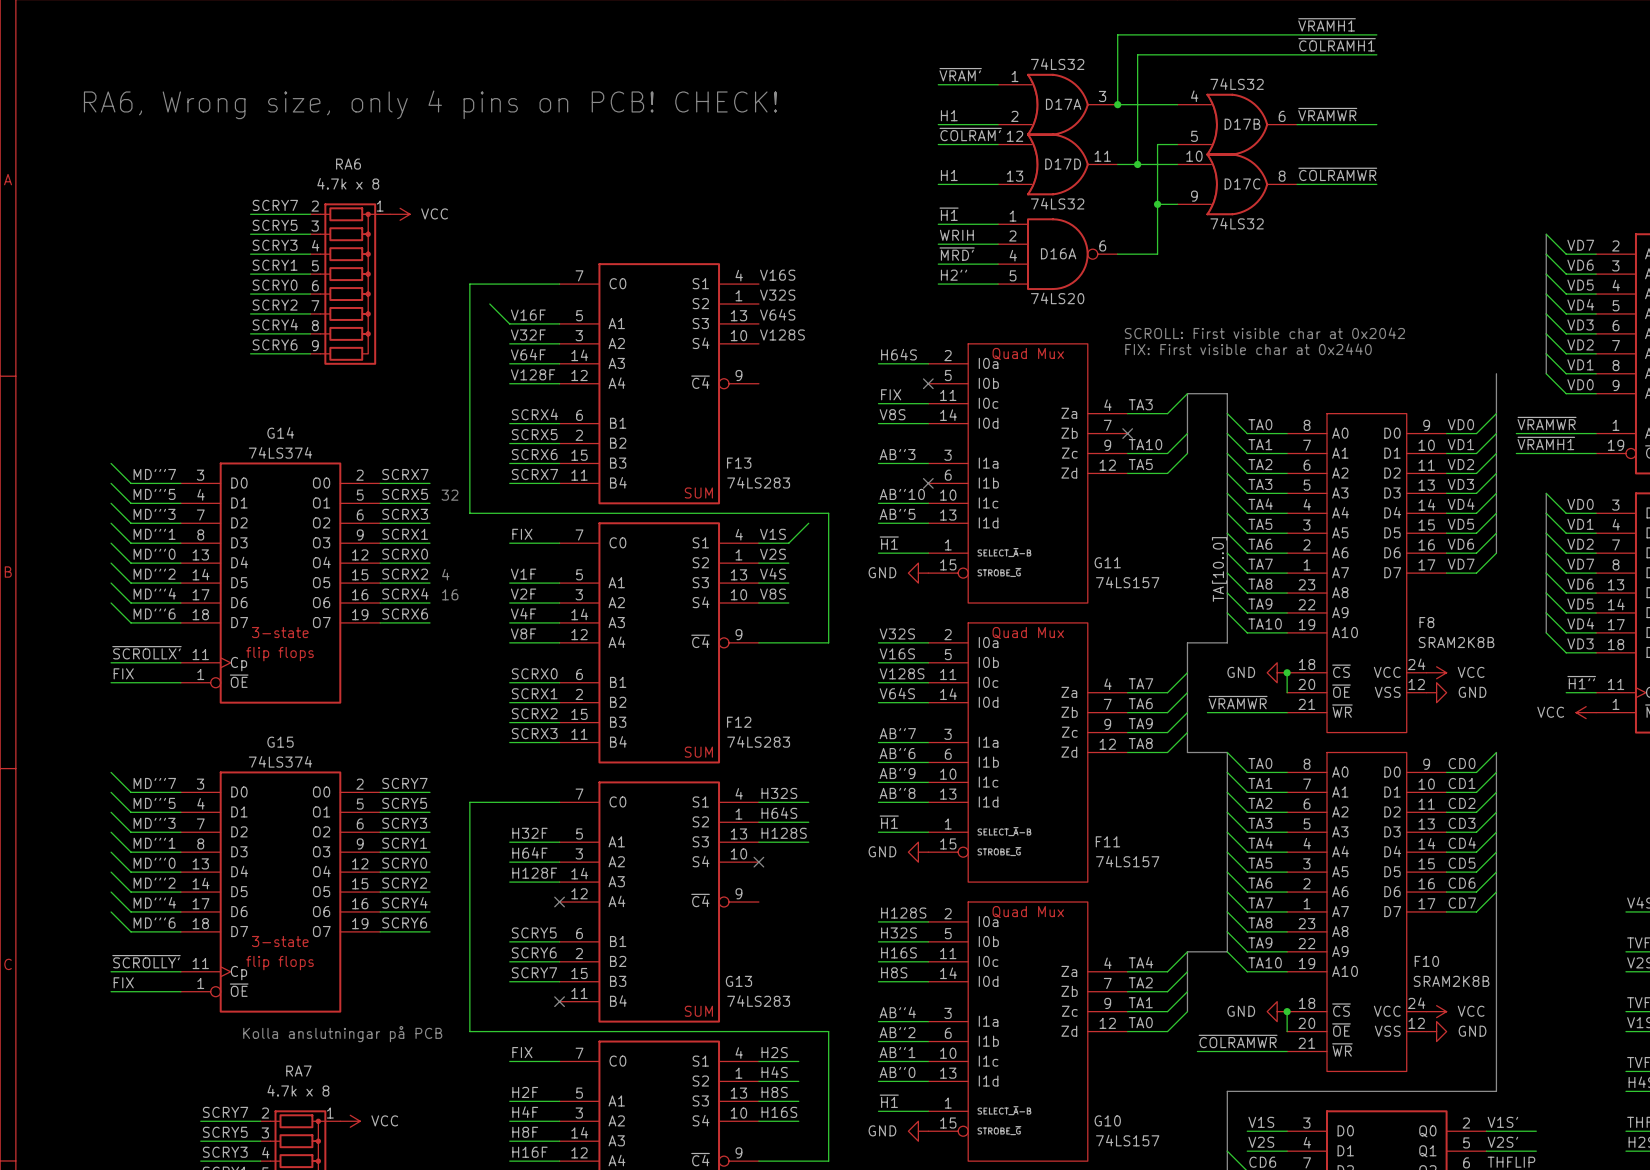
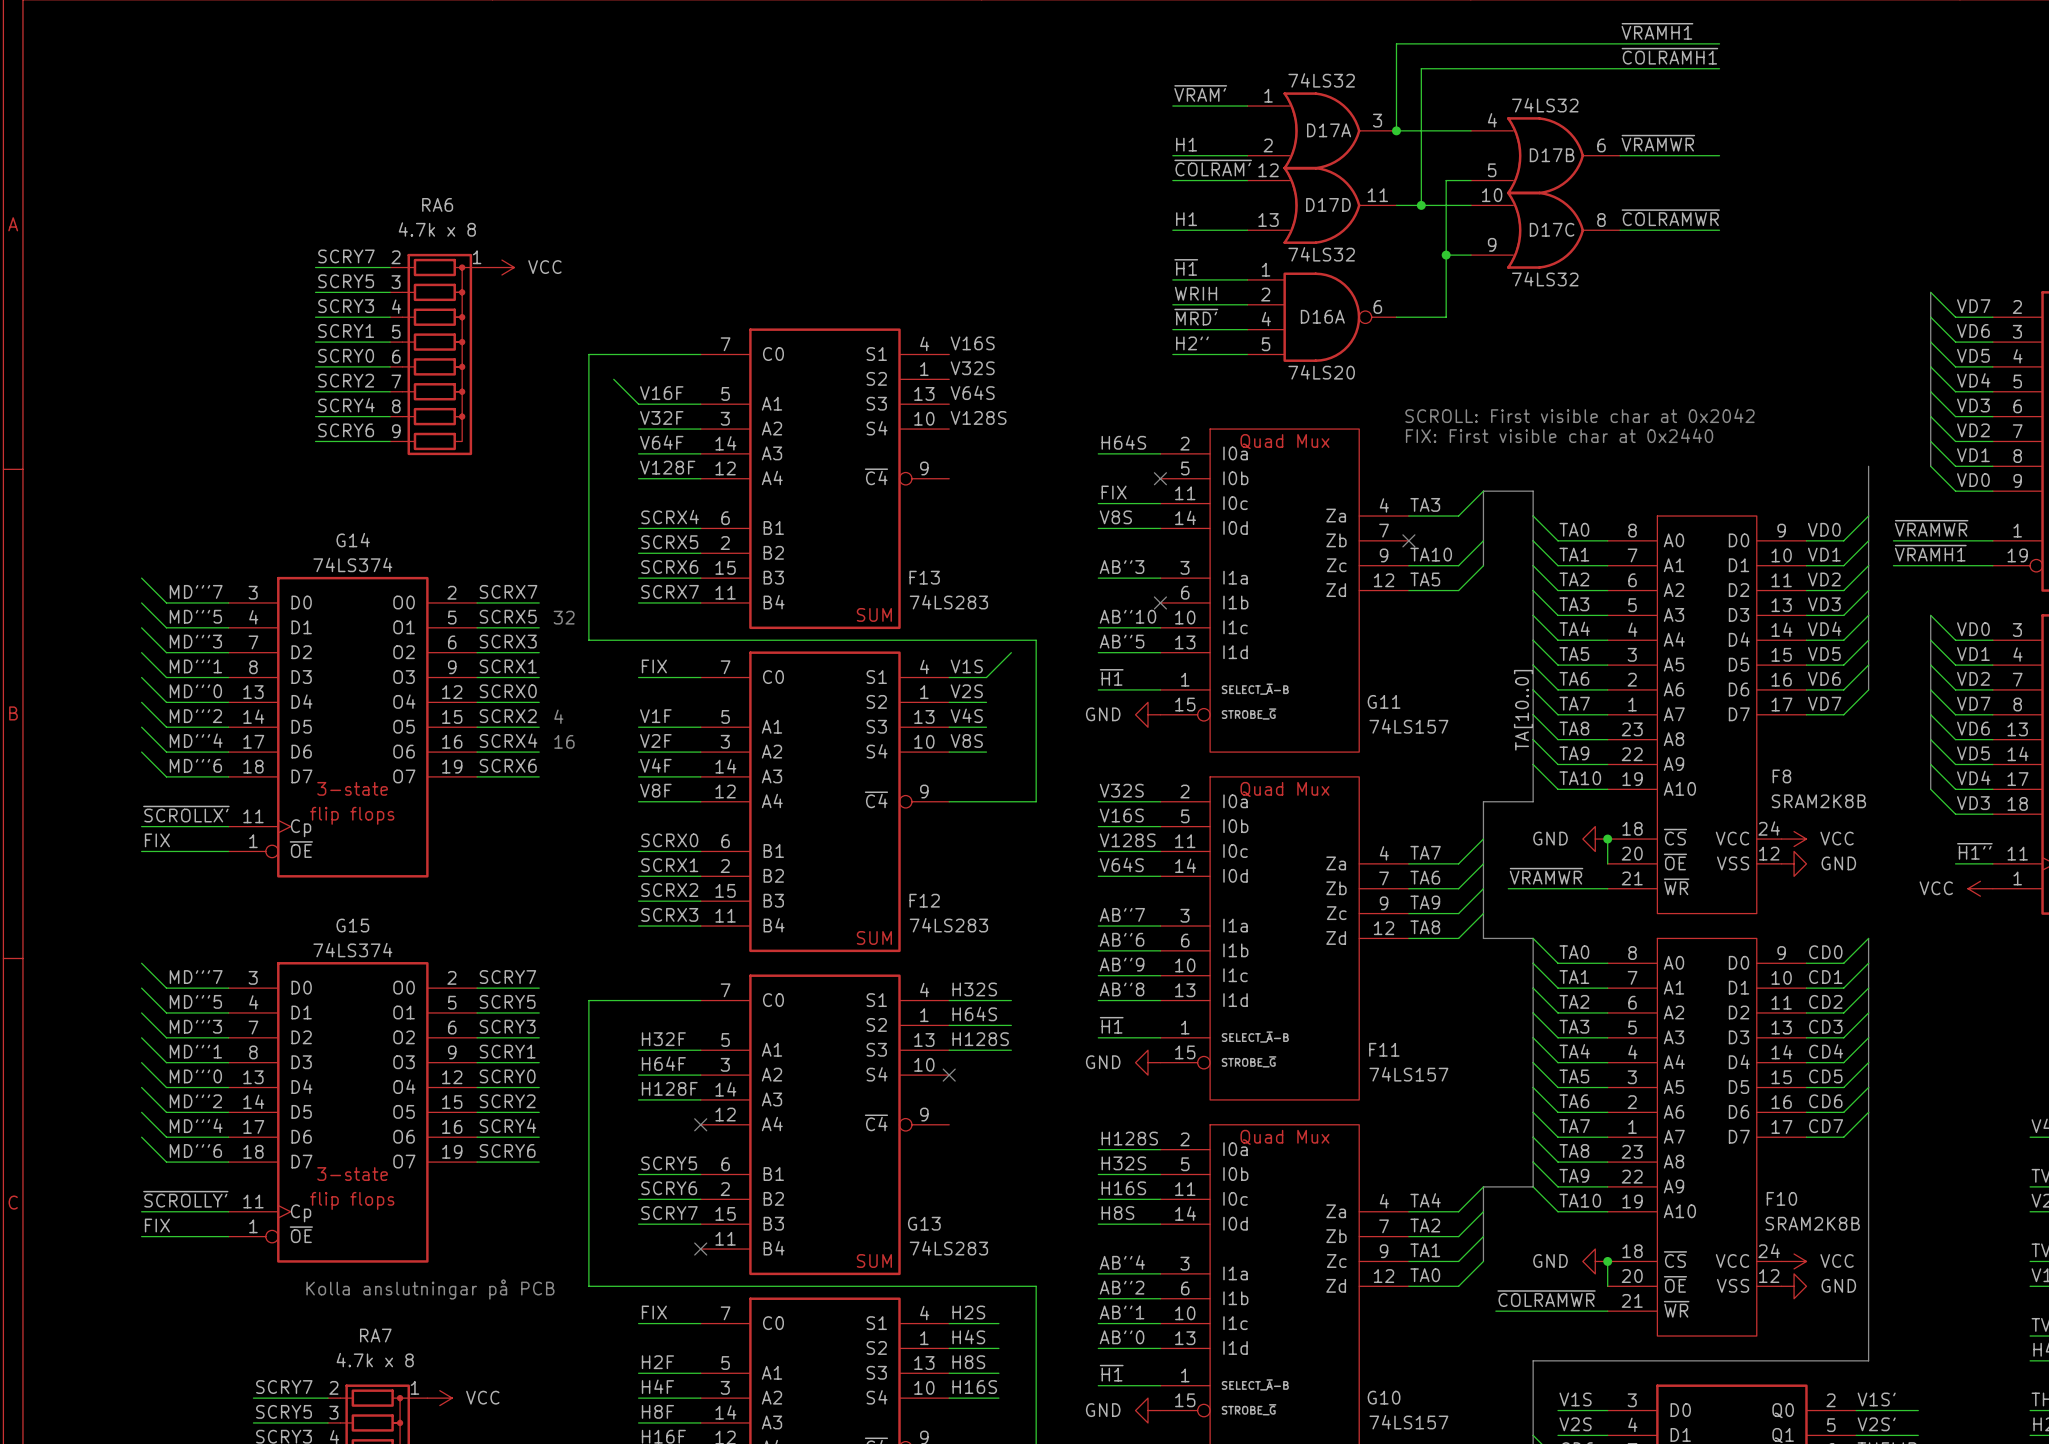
text: RA6, Wrong size, only 4 pins on PCB! CHECK! (430, 104) -> none

